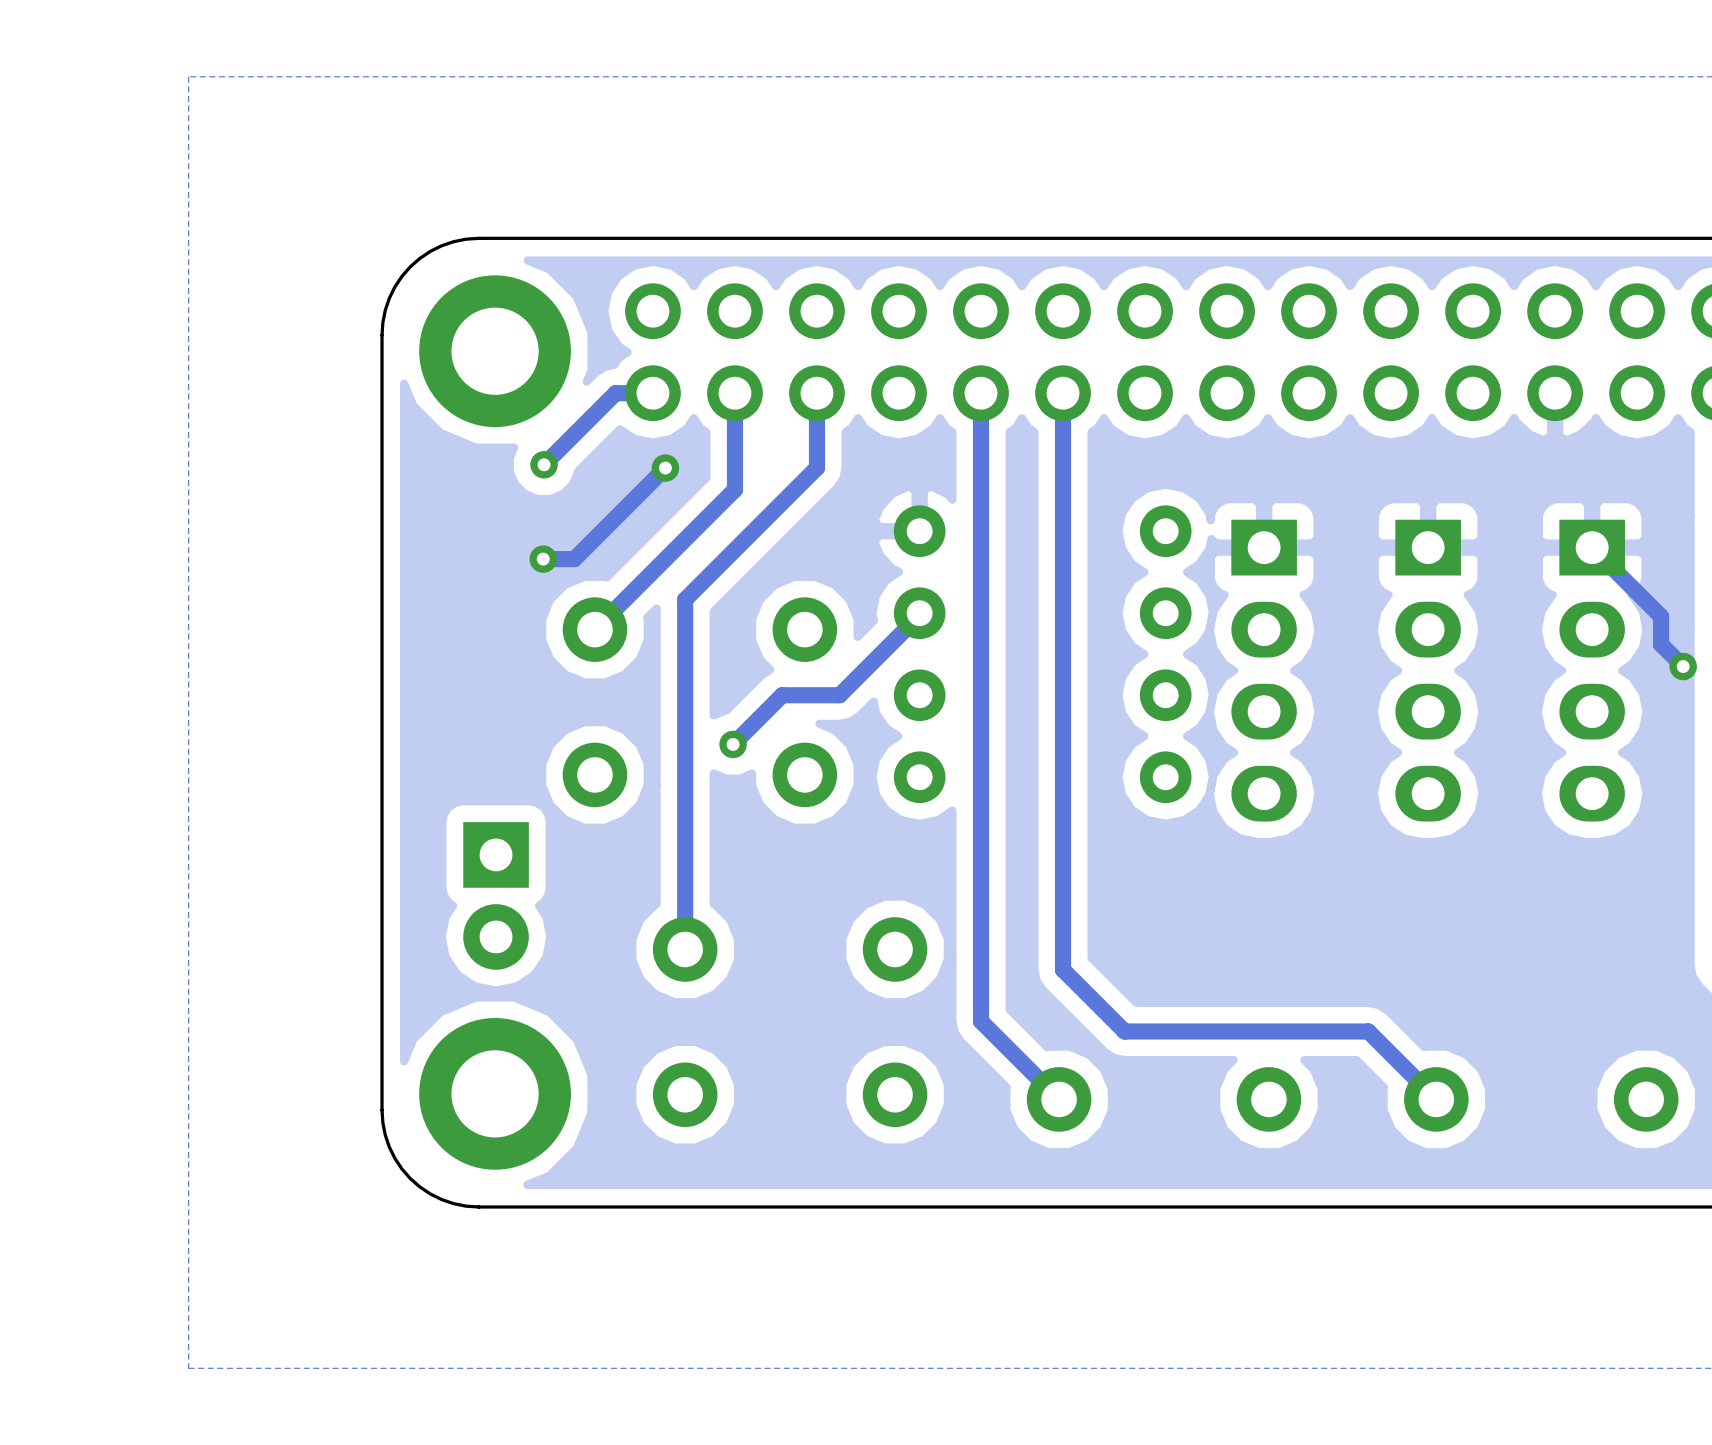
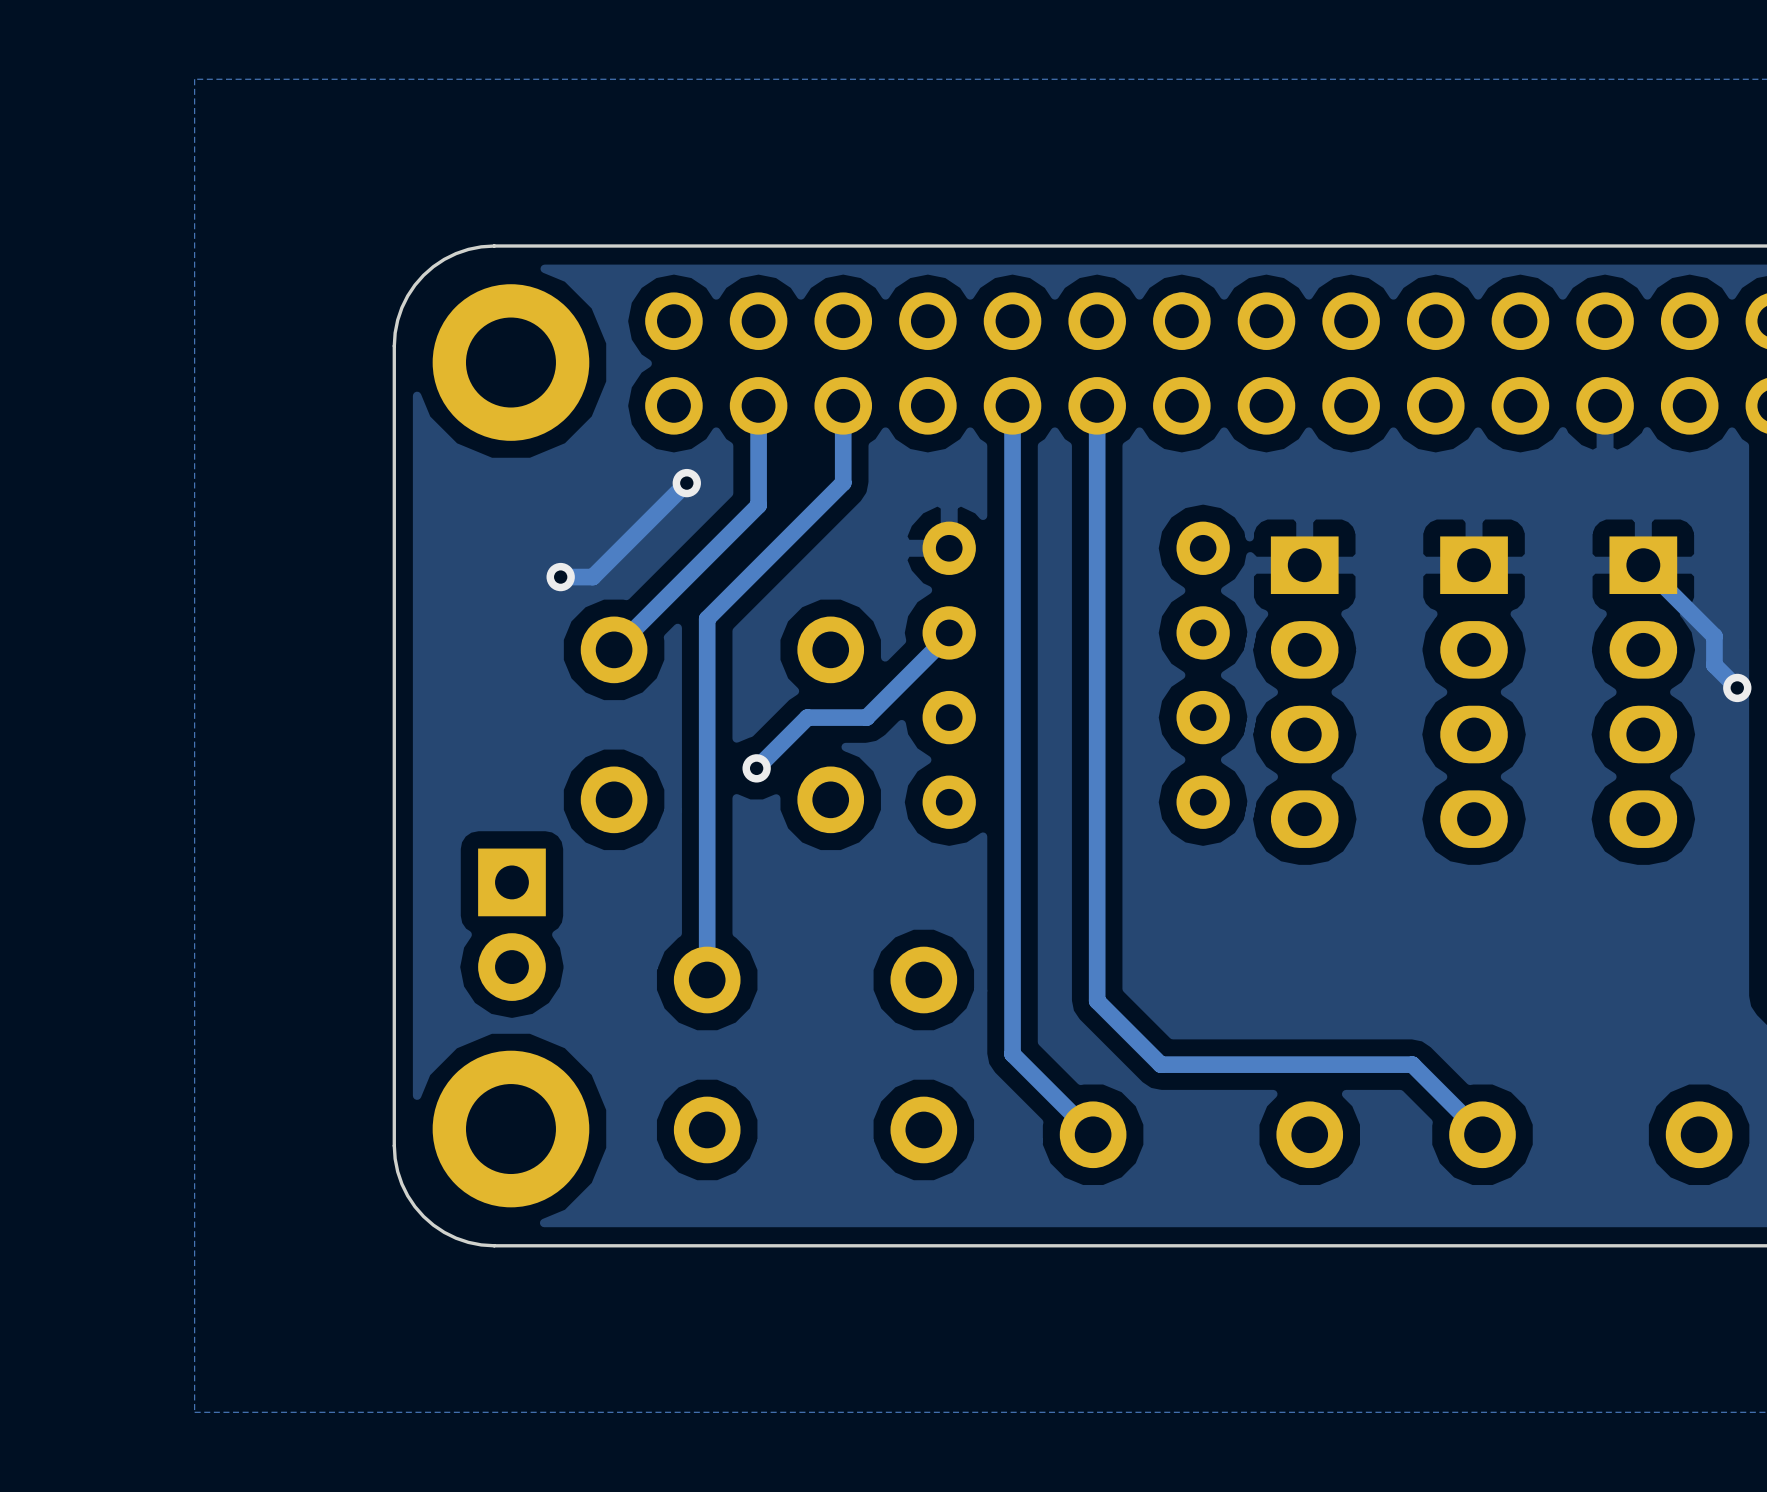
track: (652, 393) (615, 393) (544, 464) -> none
via: (544, 464) -> none

